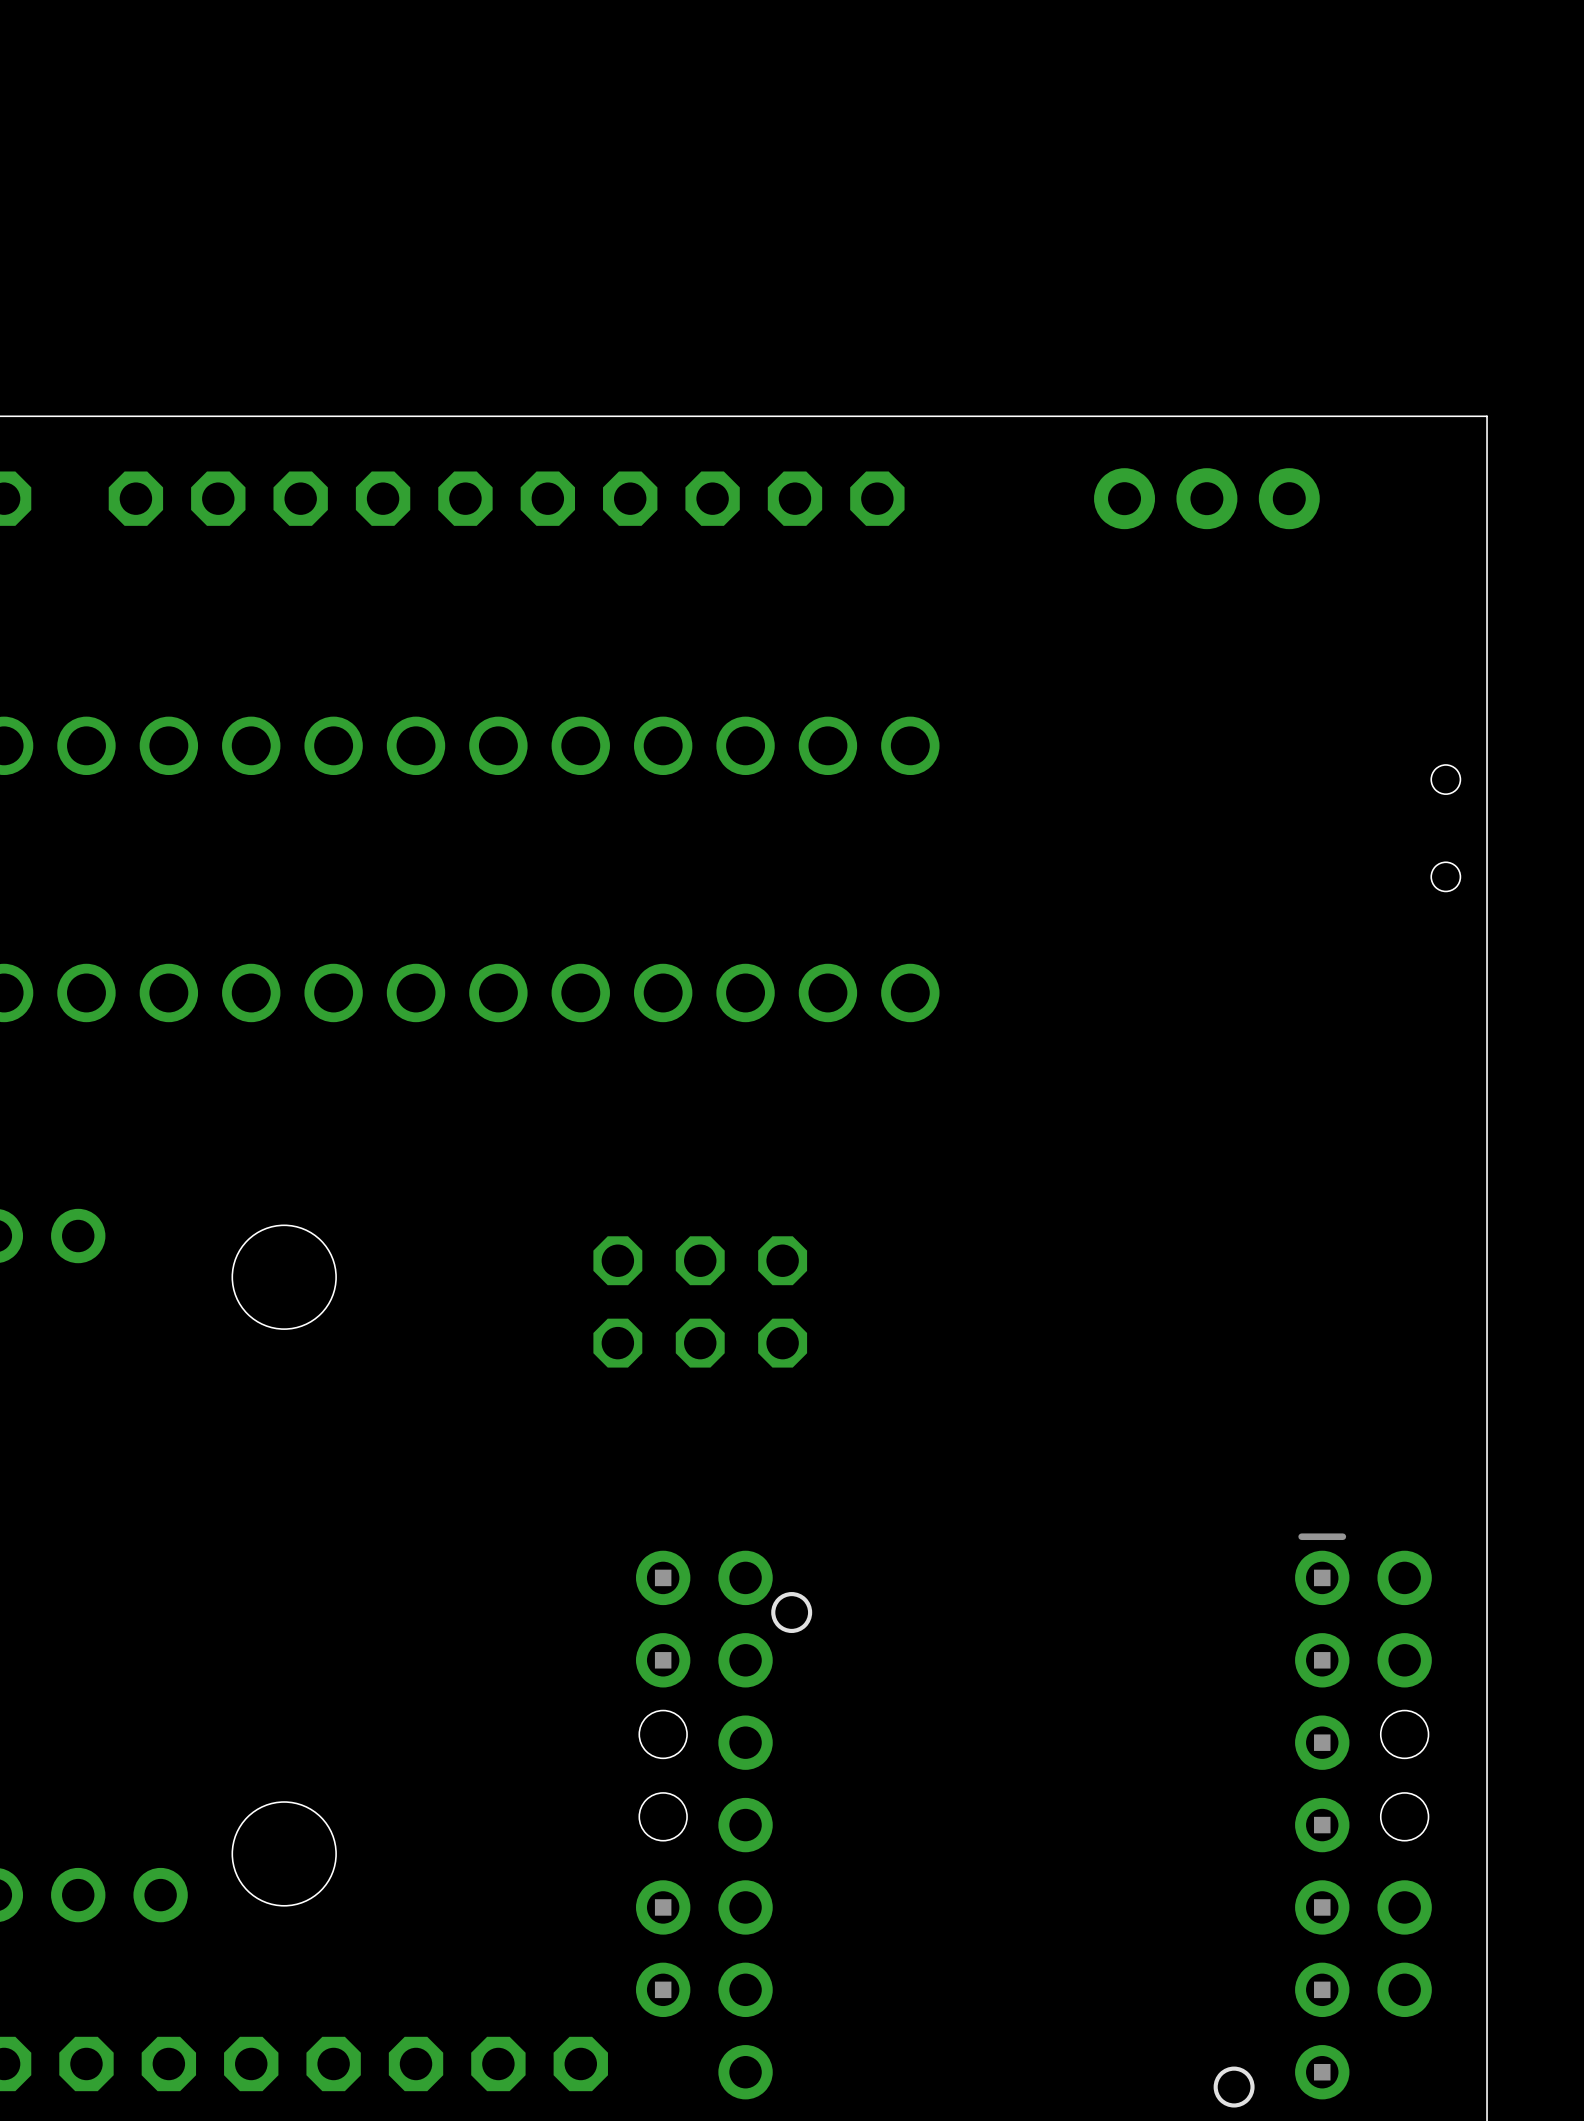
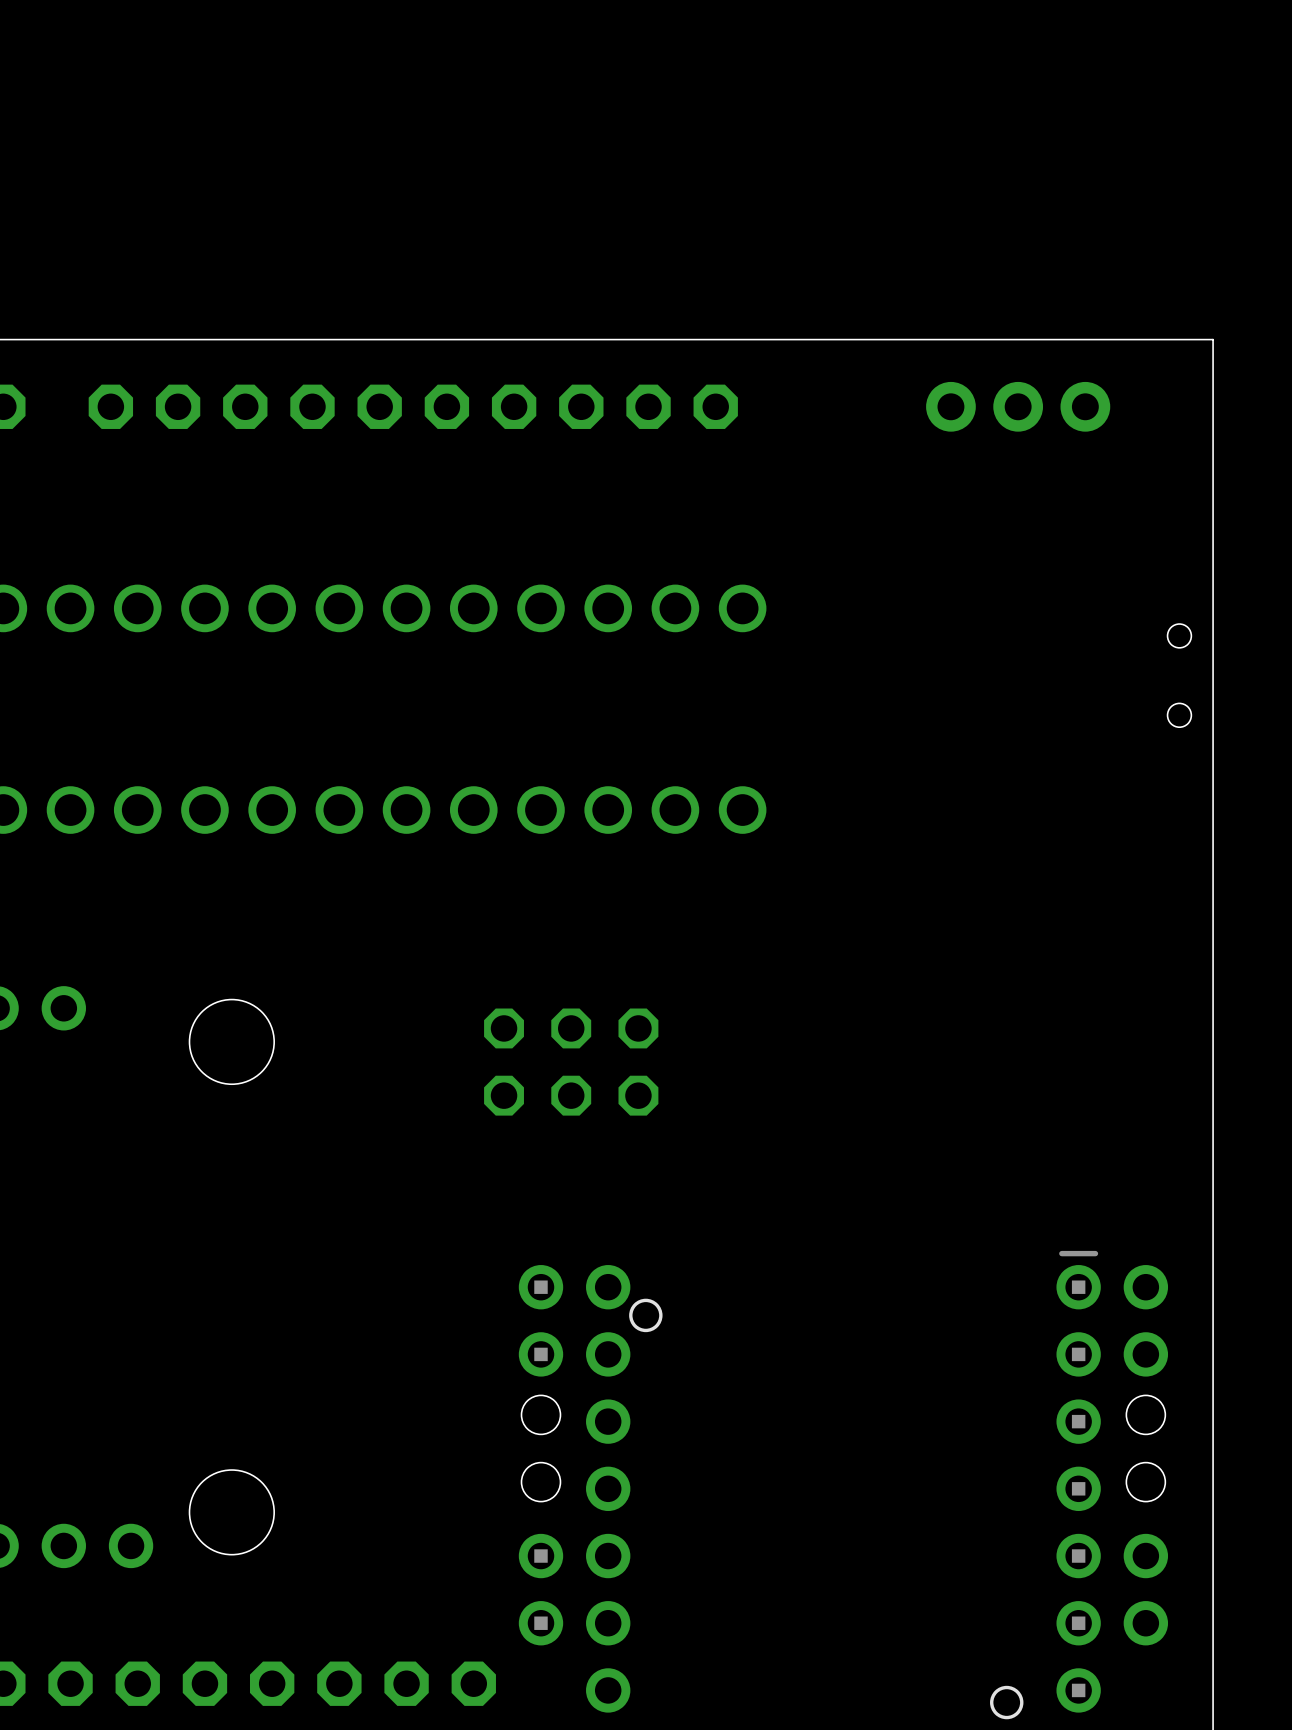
part position: (1206, 498) -> (1018, 406)

